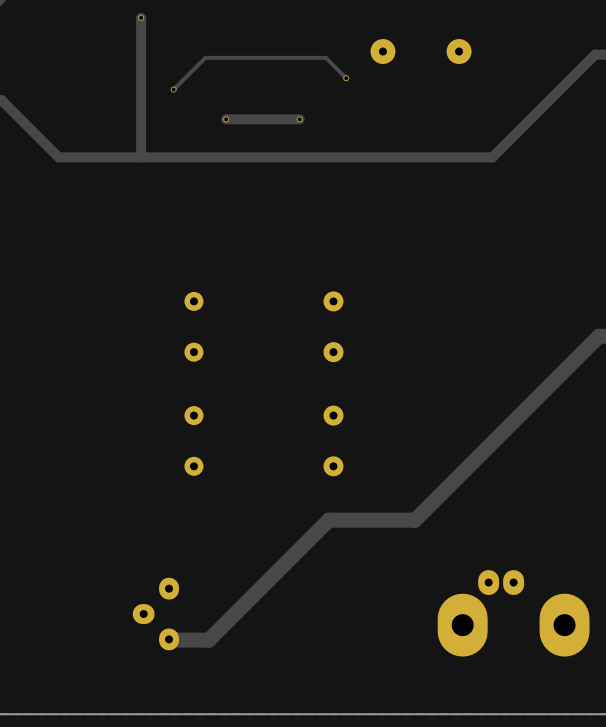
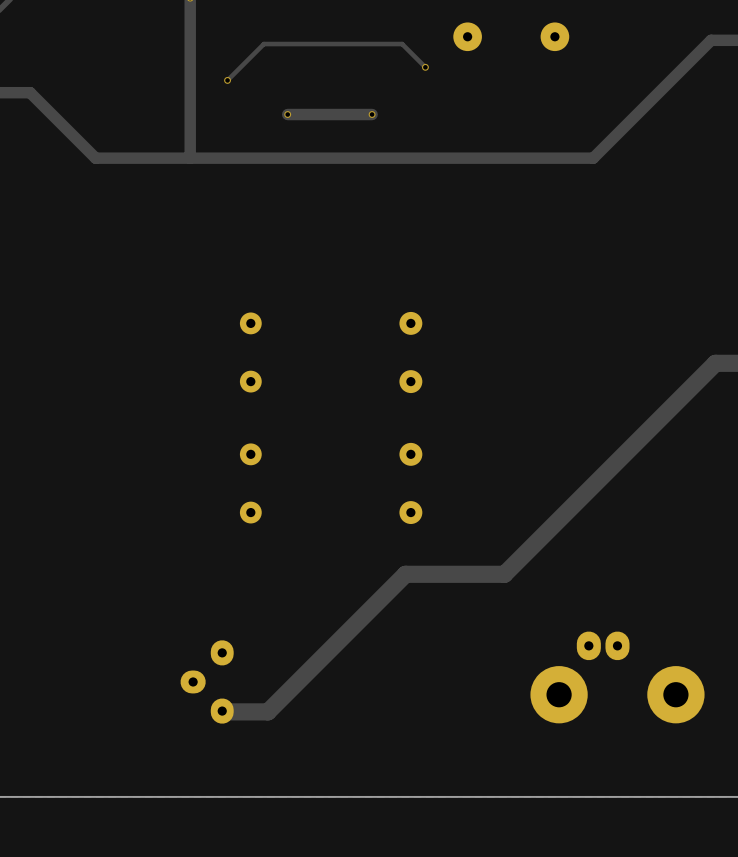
part footprint: [437, 570, 590, 657] -> [530, 631, 705, 724]

